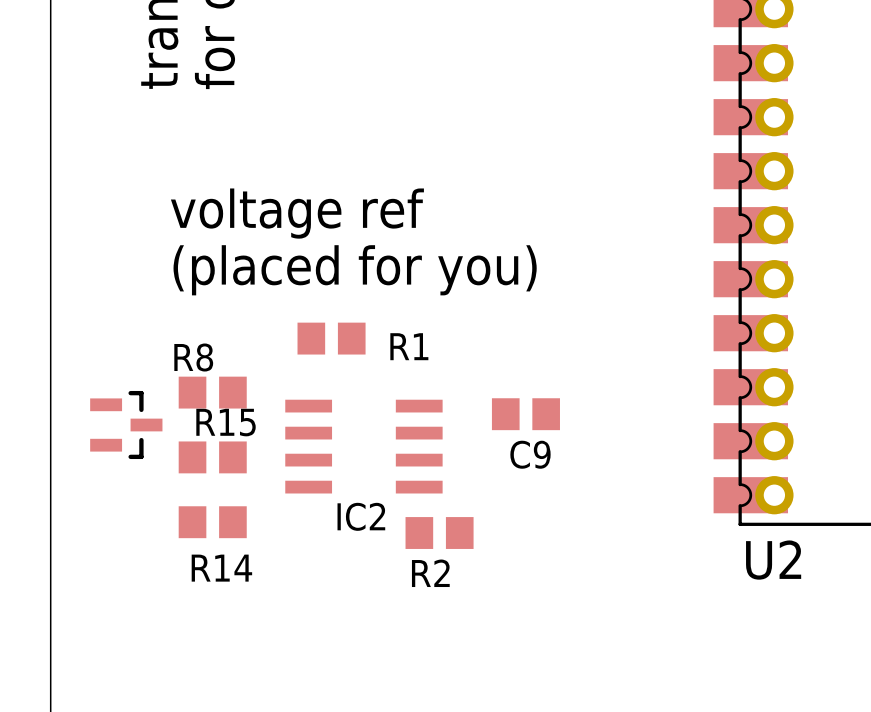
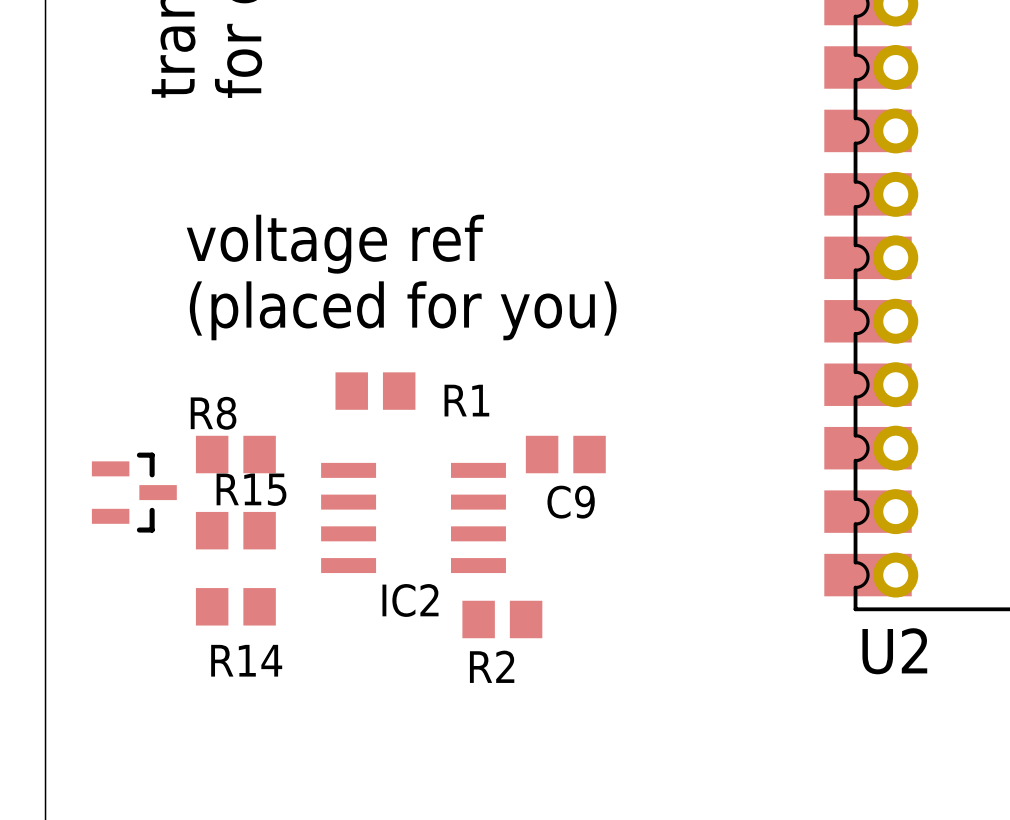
C9 position: (525, 414) -> (565, 454)

